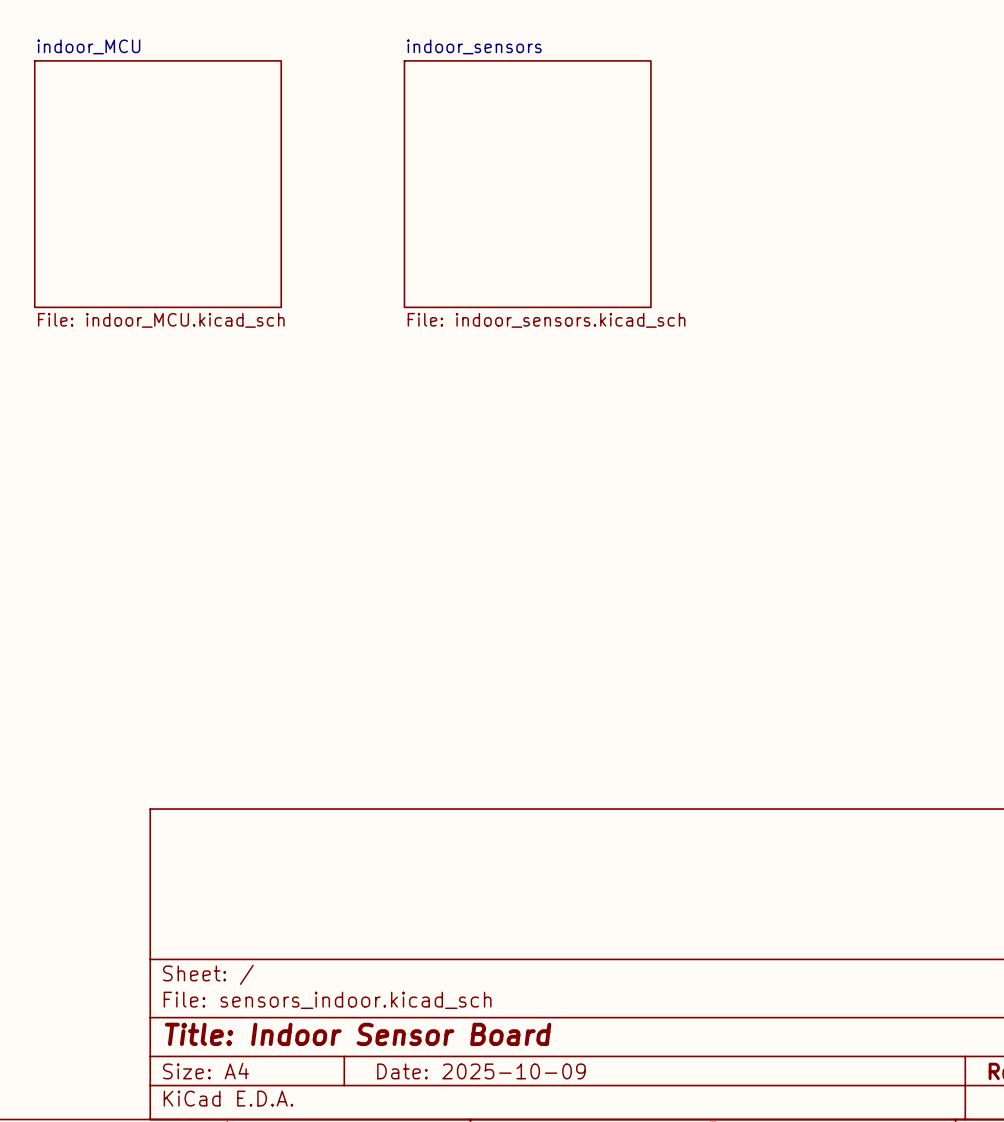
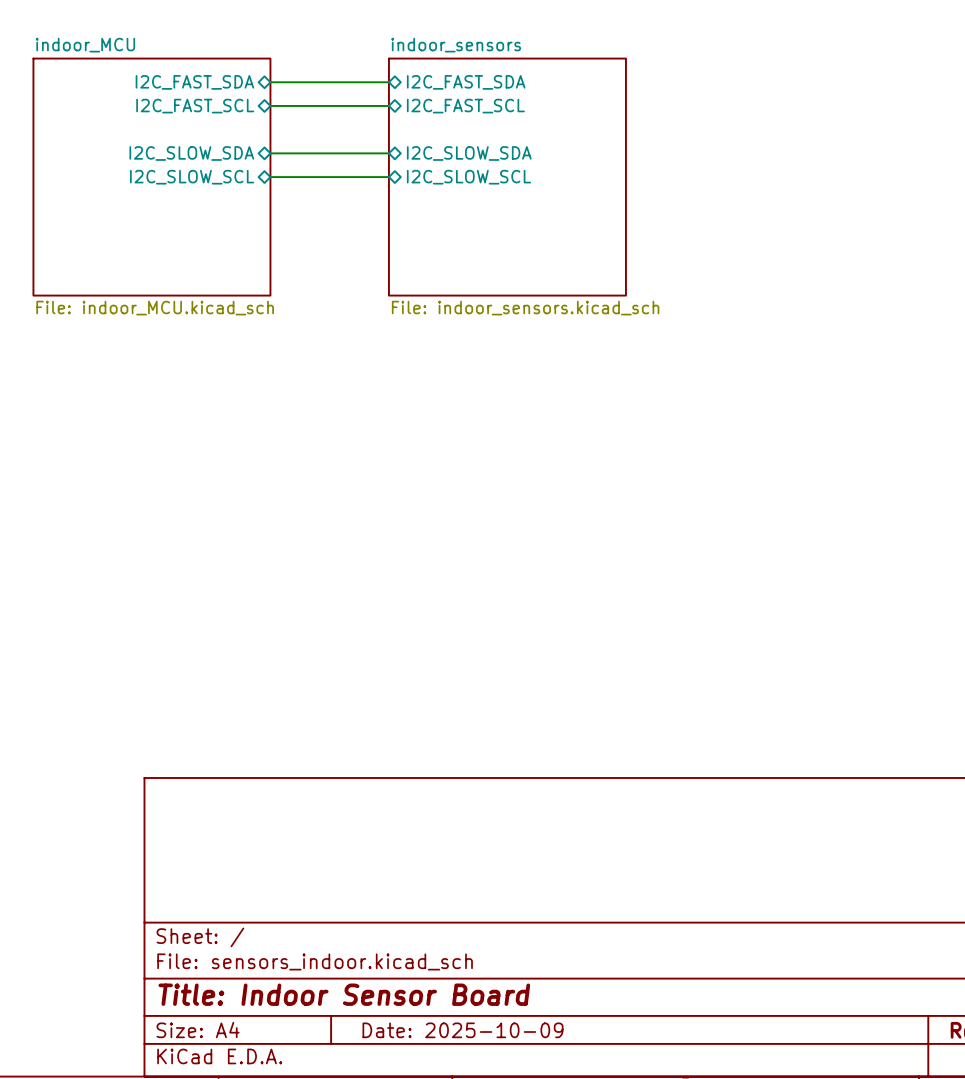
sheet pin: none -> I2C_FAST_SDA (194, 82)
wire: none -> (270, 82) (388, 82)
sheet pin: none -> I2C_FAST_SDA (466, 82)
sheet pin: none -> I2C_FAST_SCL (195, 106)
wire: none -> (270, 105) (388, 105)
sheet pin: none -> I2C_FAST_SCL (465, 106)
sheet pin: none -> I2C_SLOW_SDA (191, 153)
wire: none -> (270, 153) (388, 153)
sheet pin: none -> I2C_SLOW_SDA (469, 153)
sheet pin: none -> I2C_SLOW_SCL (192, 177)
wire: none -> (270, 177) (388, 177)
sheet pin: none -> I2C_SLOW_SCL (468, 177)

